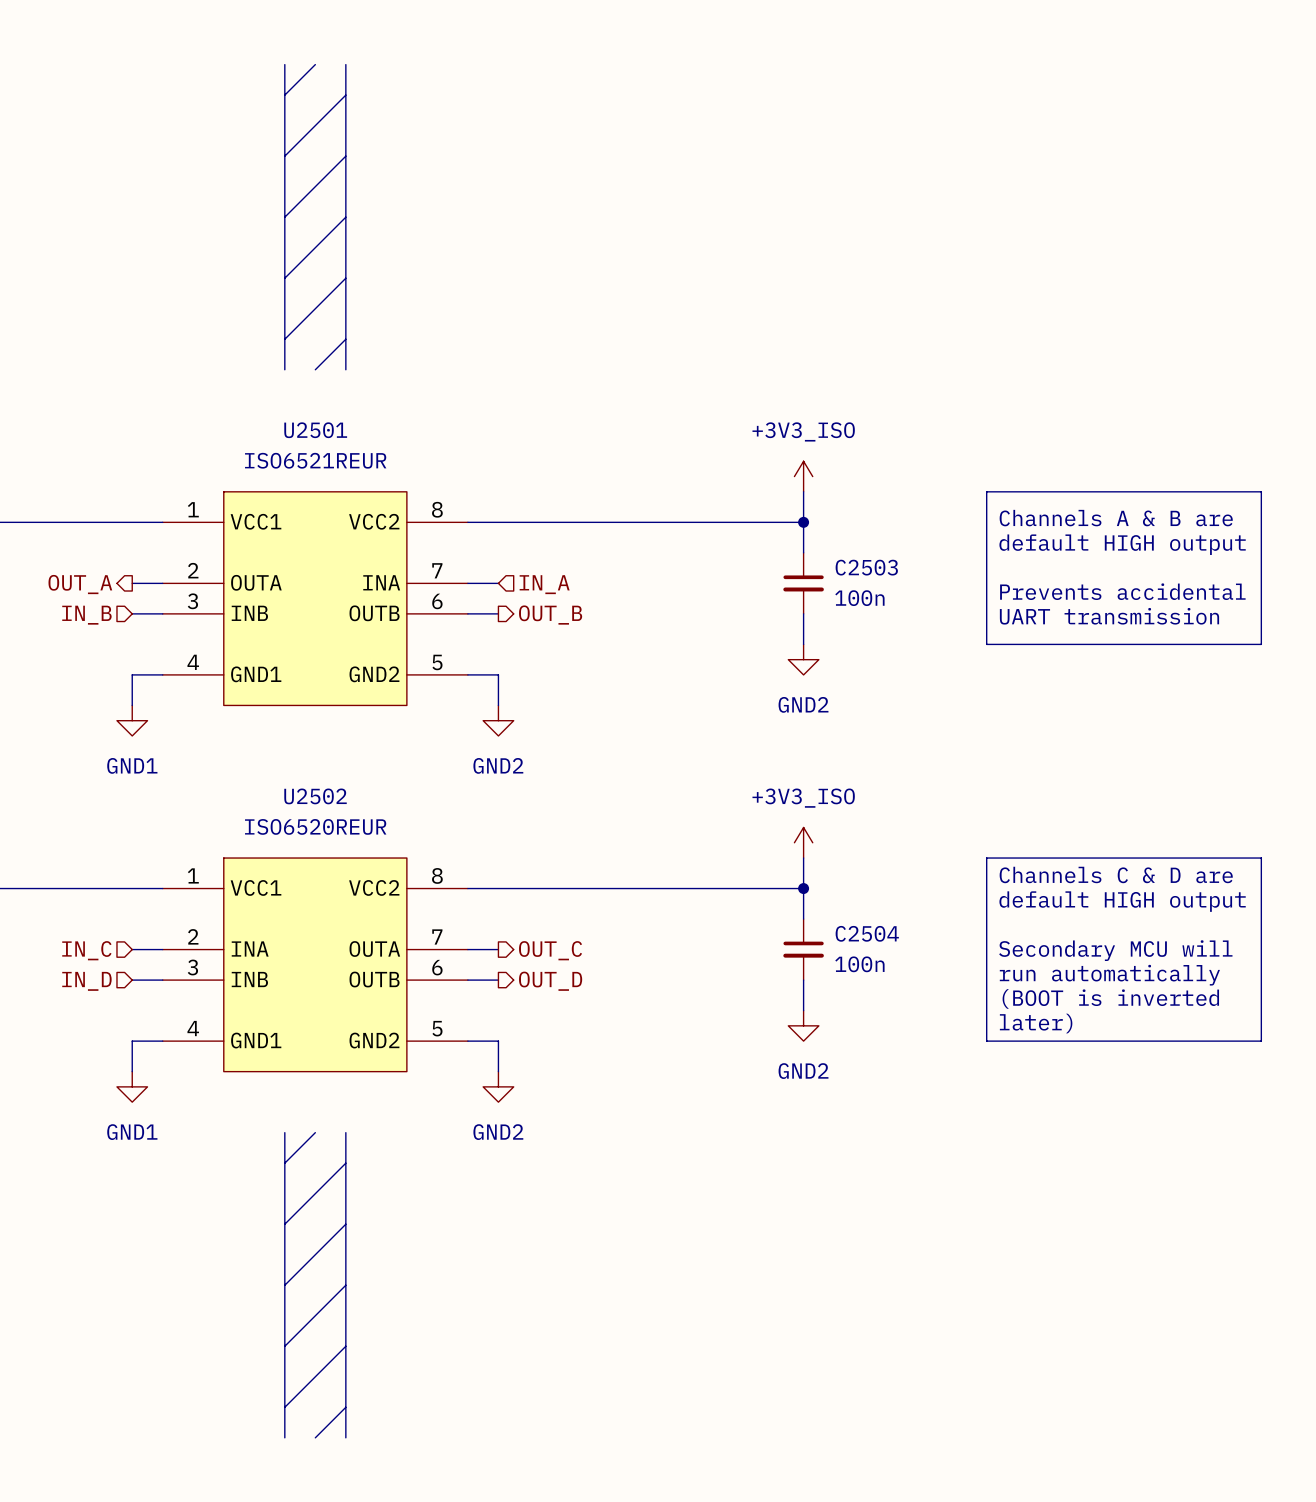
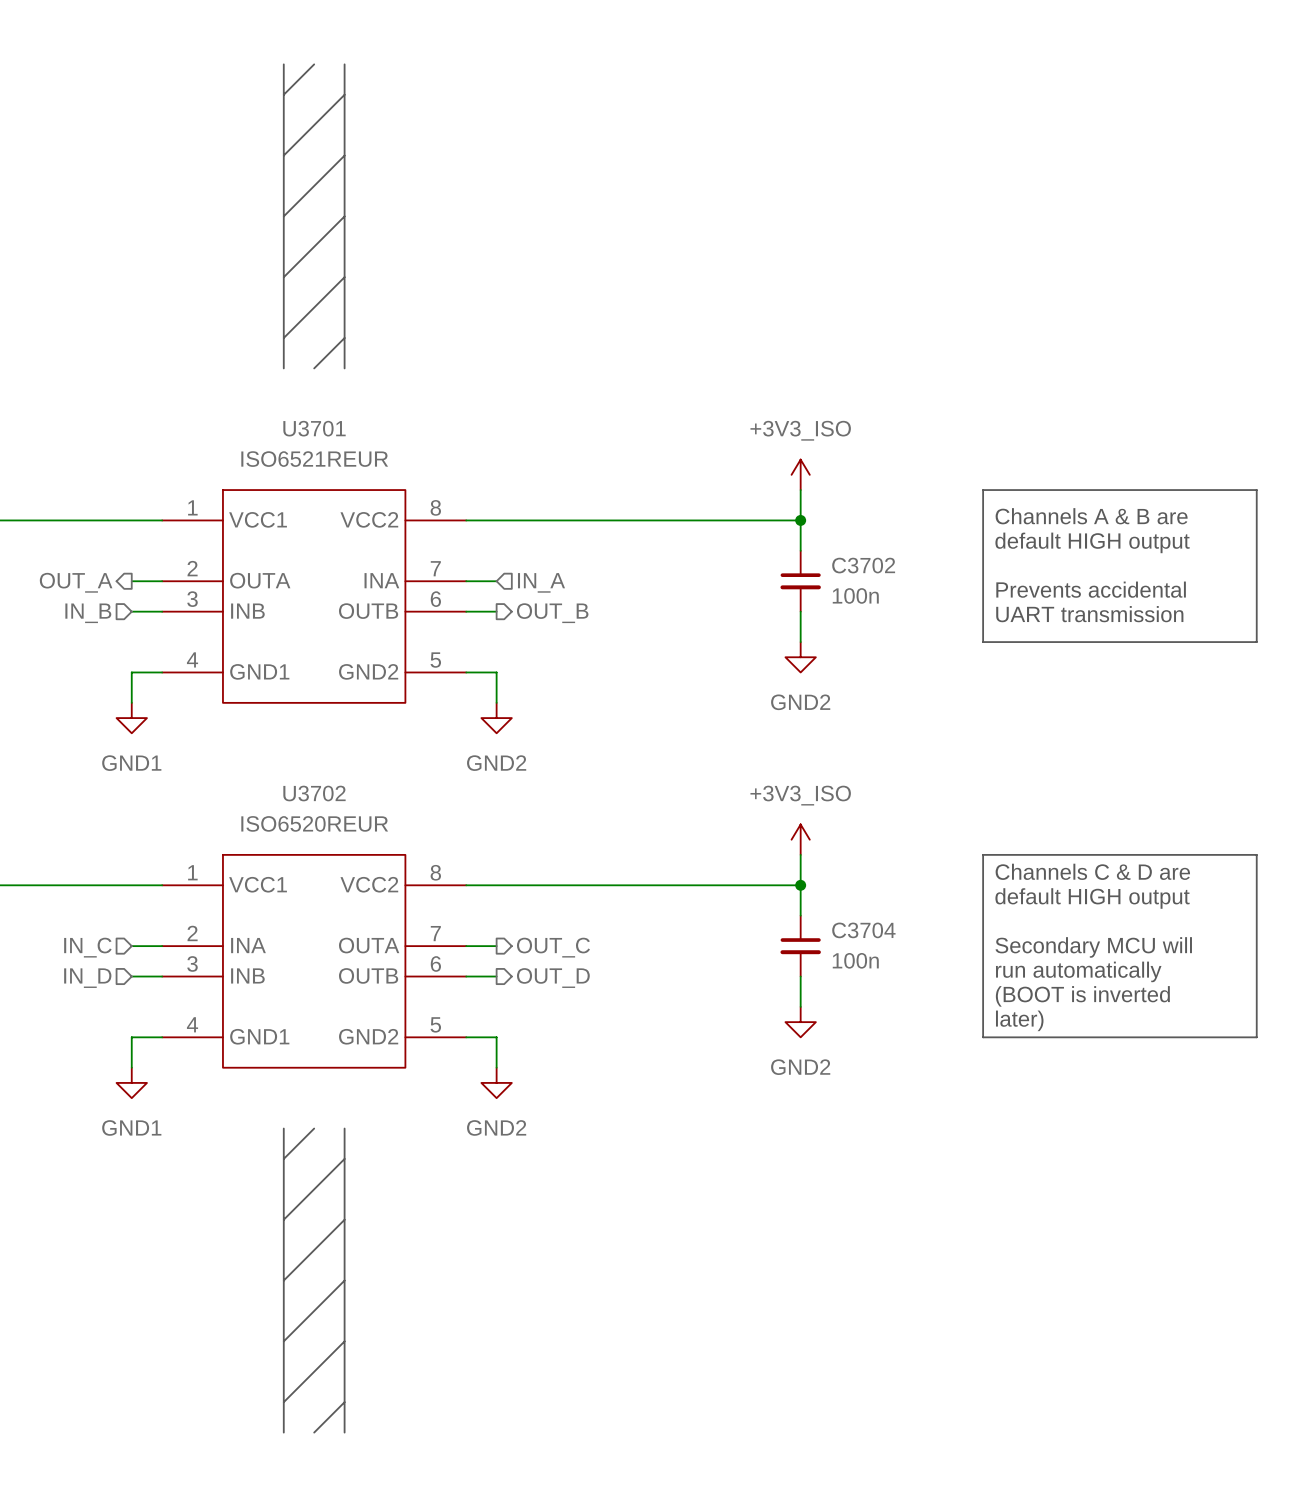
U2501 name: U2501 (315, 430) -> U3701 (314, 428)
C2503 name: C2503 (866, 567) -> C3702 (863, 565)
U2502 name: U2502 (315, 796) -> U3702 (314, 793)
C2504 name: C2504 (867, 933) -> C3704 (863, 930)

